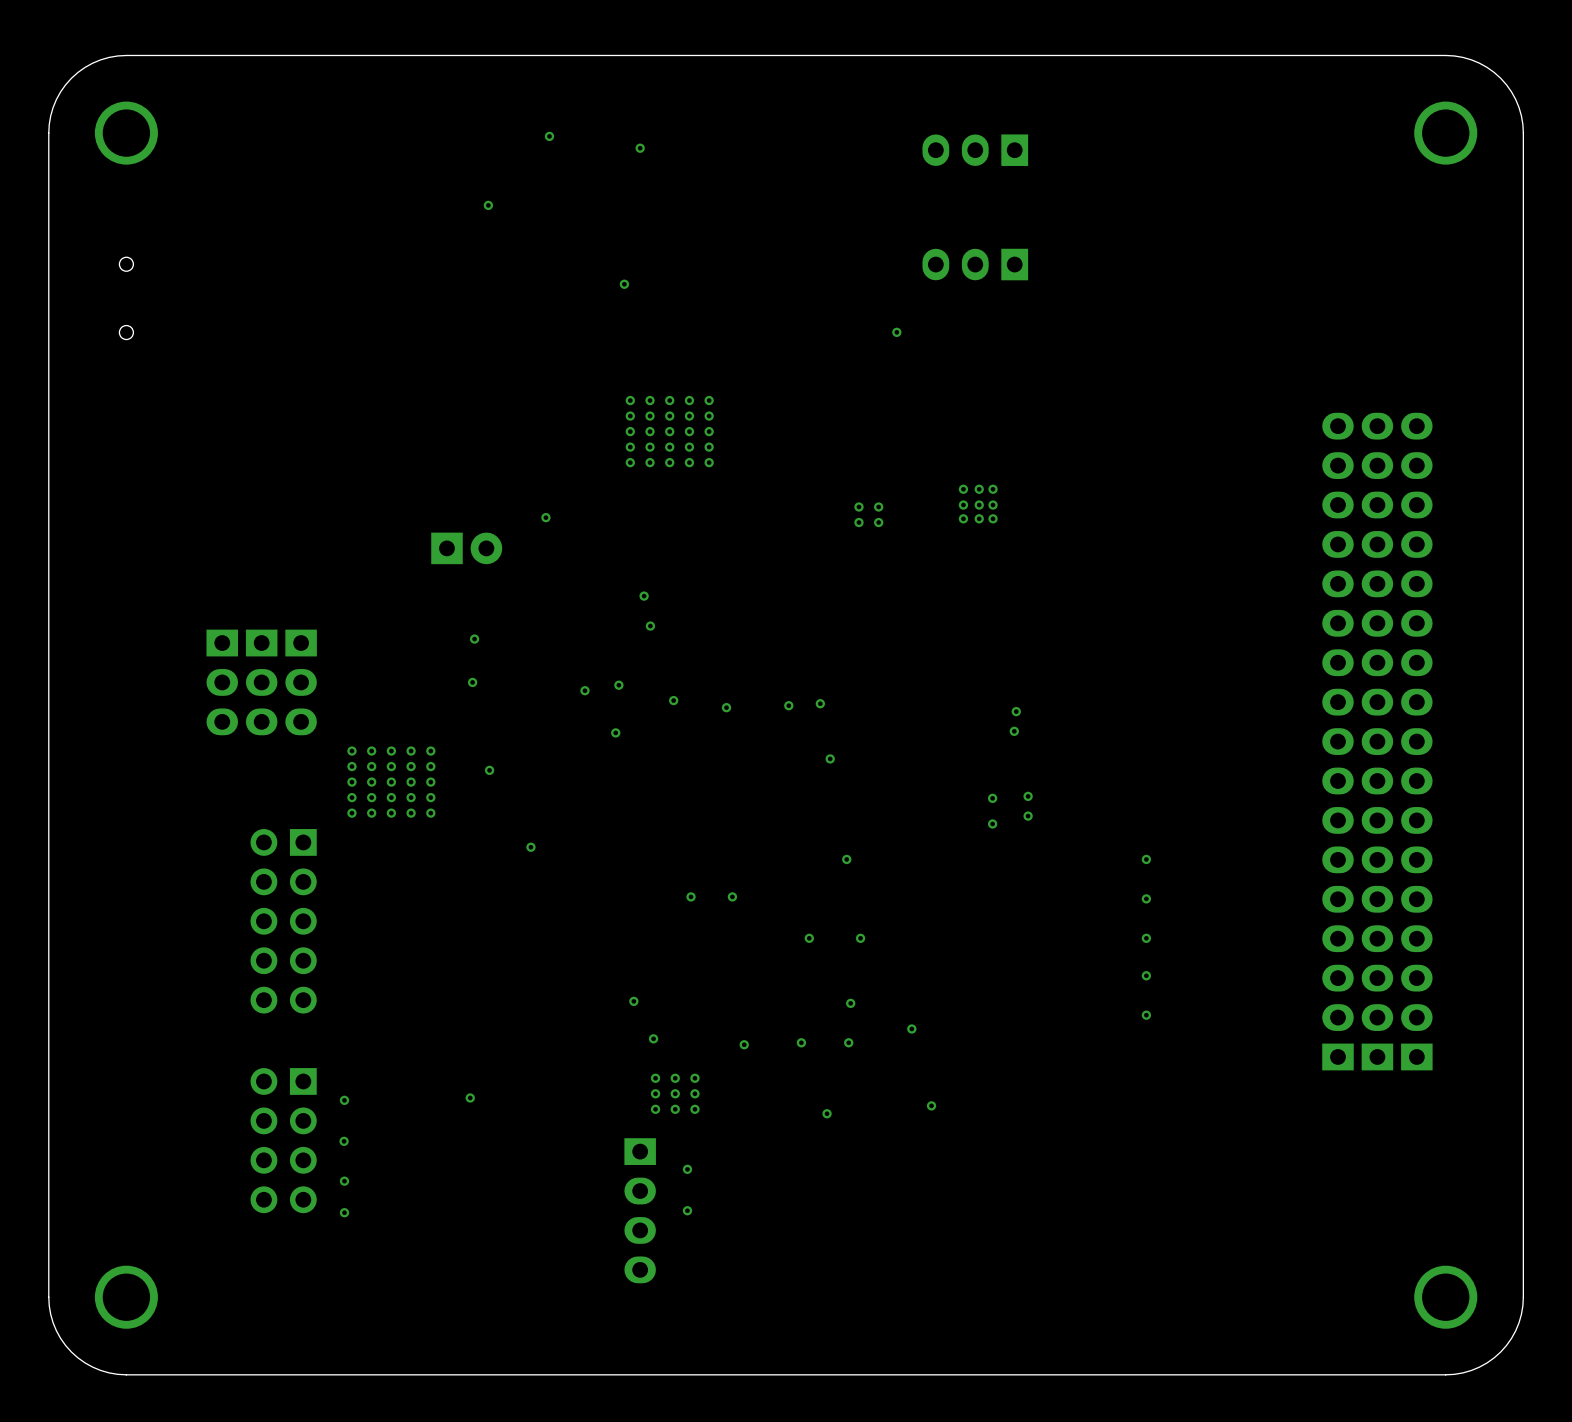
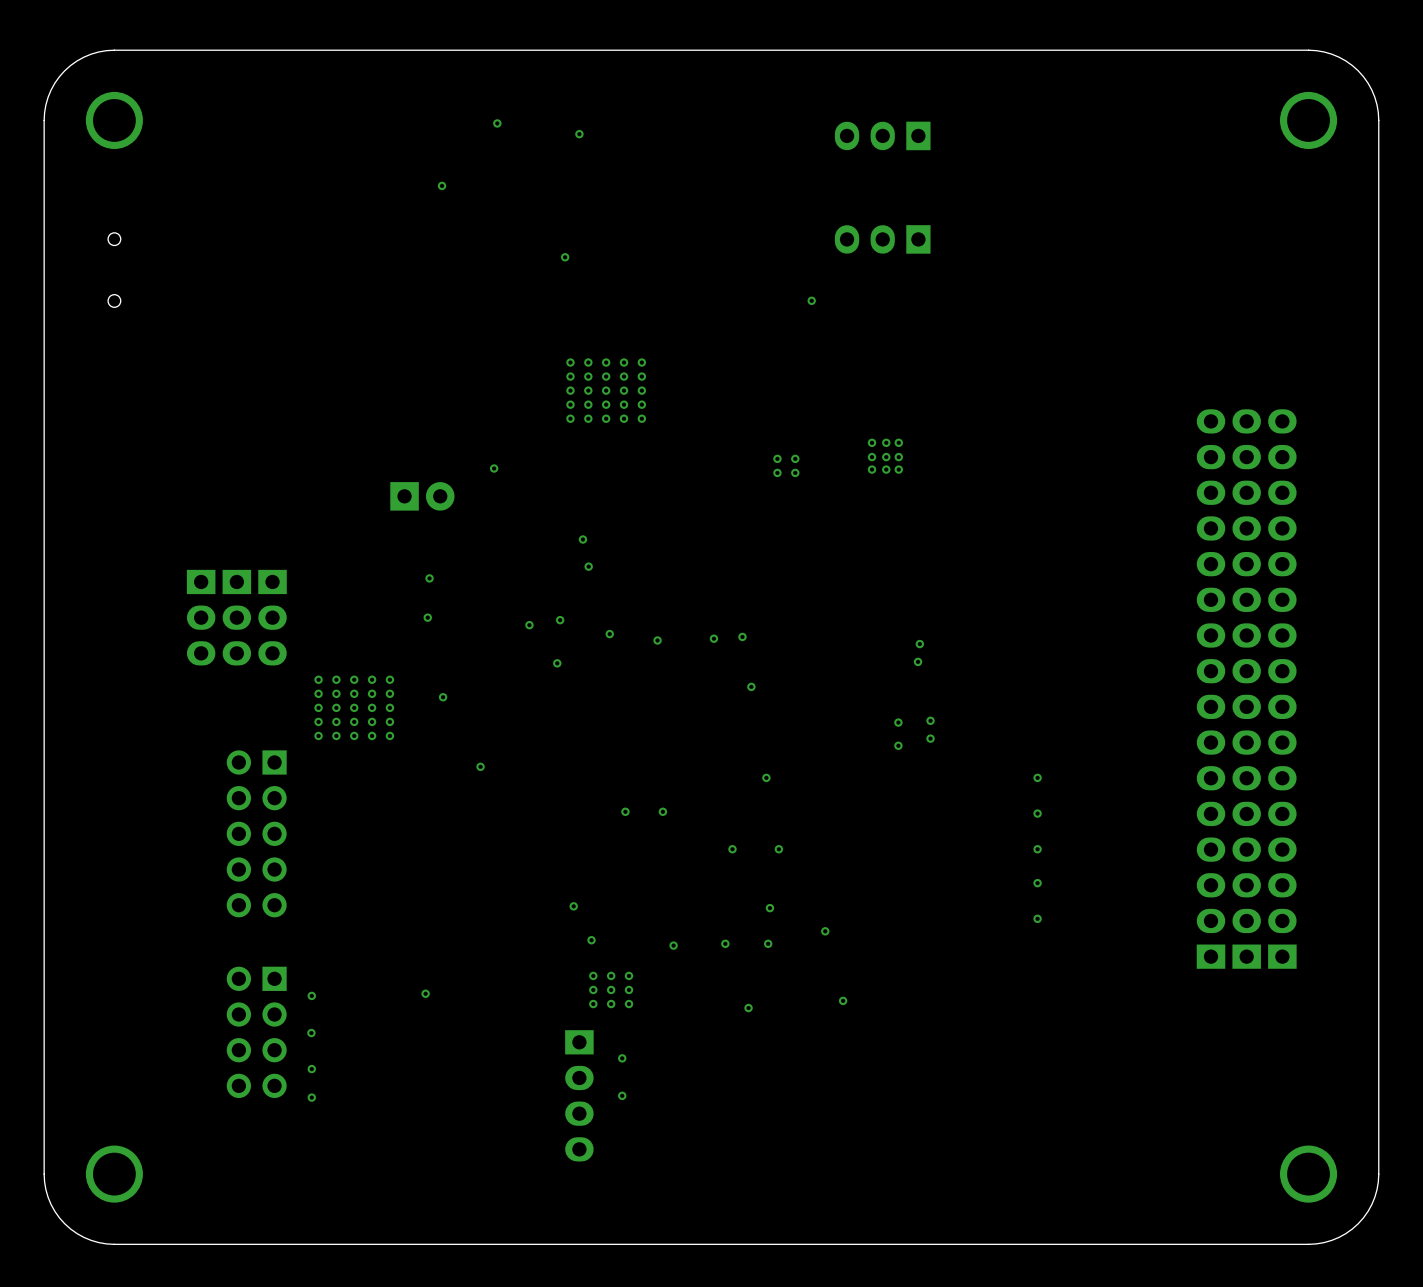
part: (1337, 741) -> none
part: (1377, 741) -> none
part: (1416, 741) -> none

